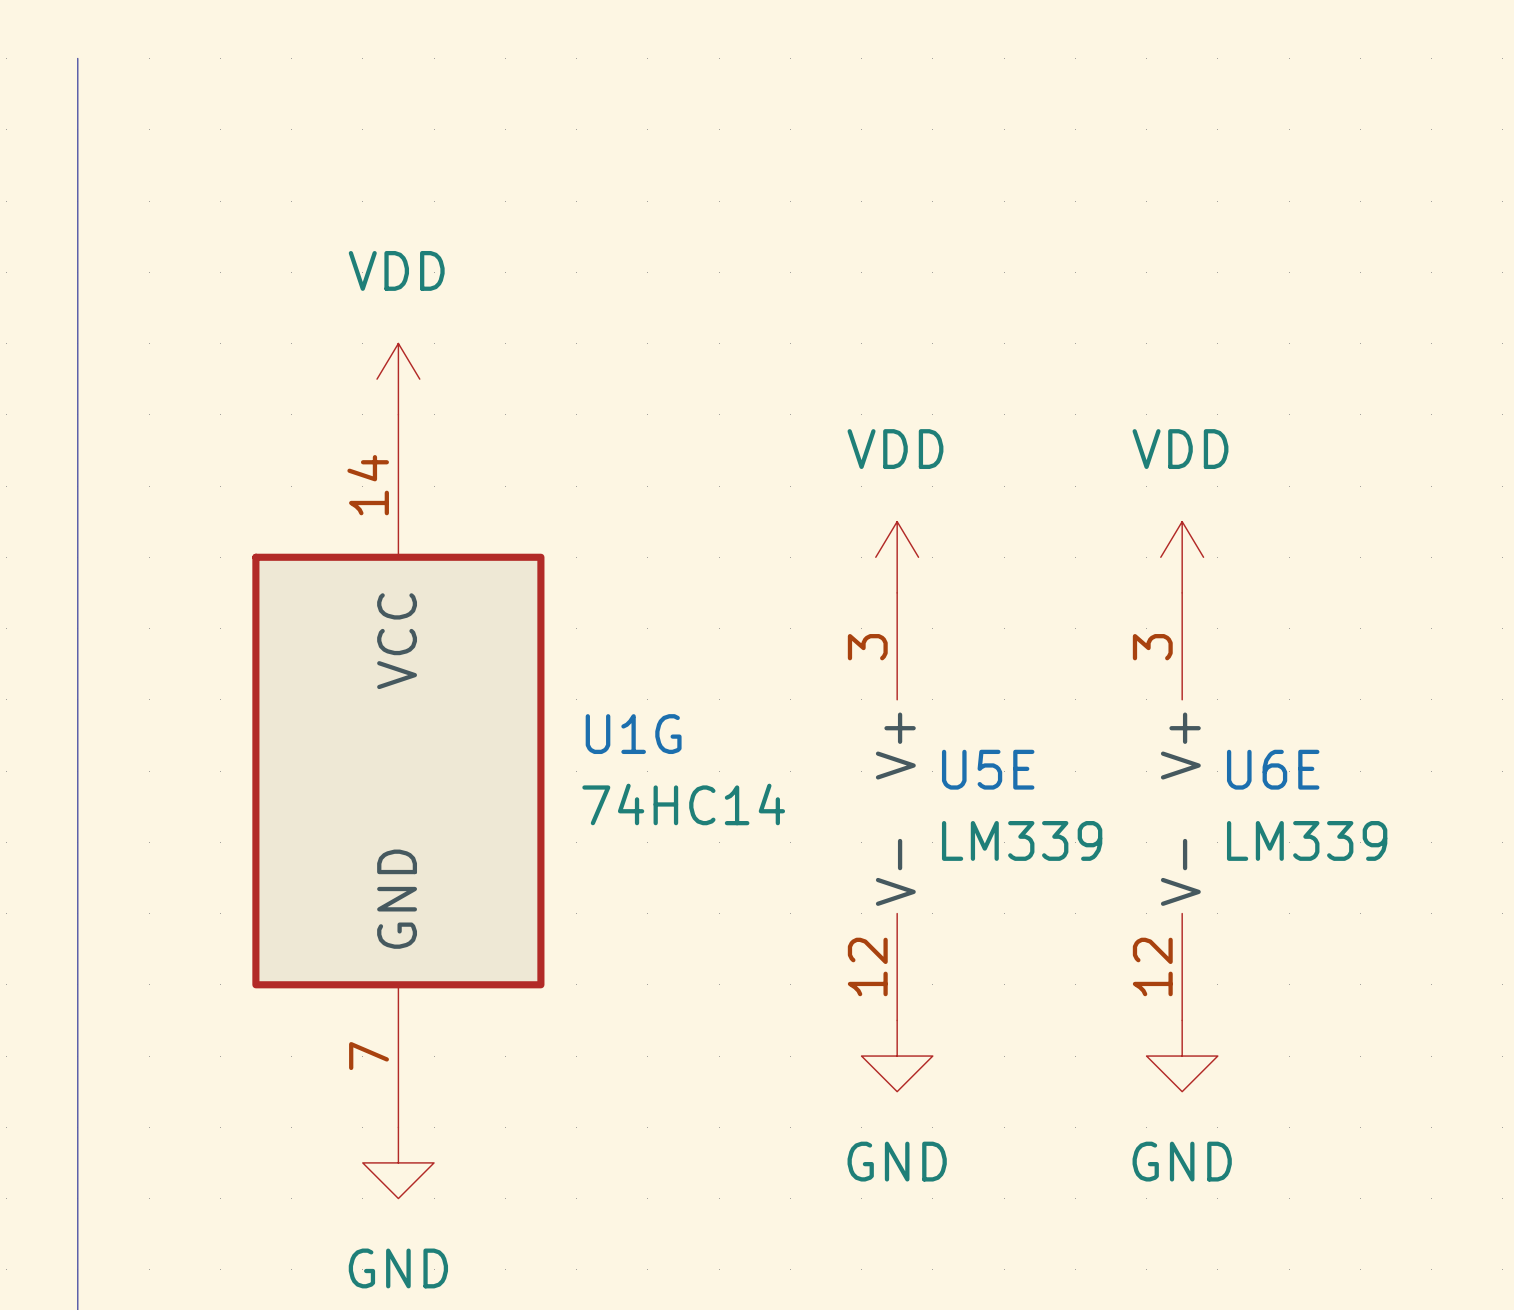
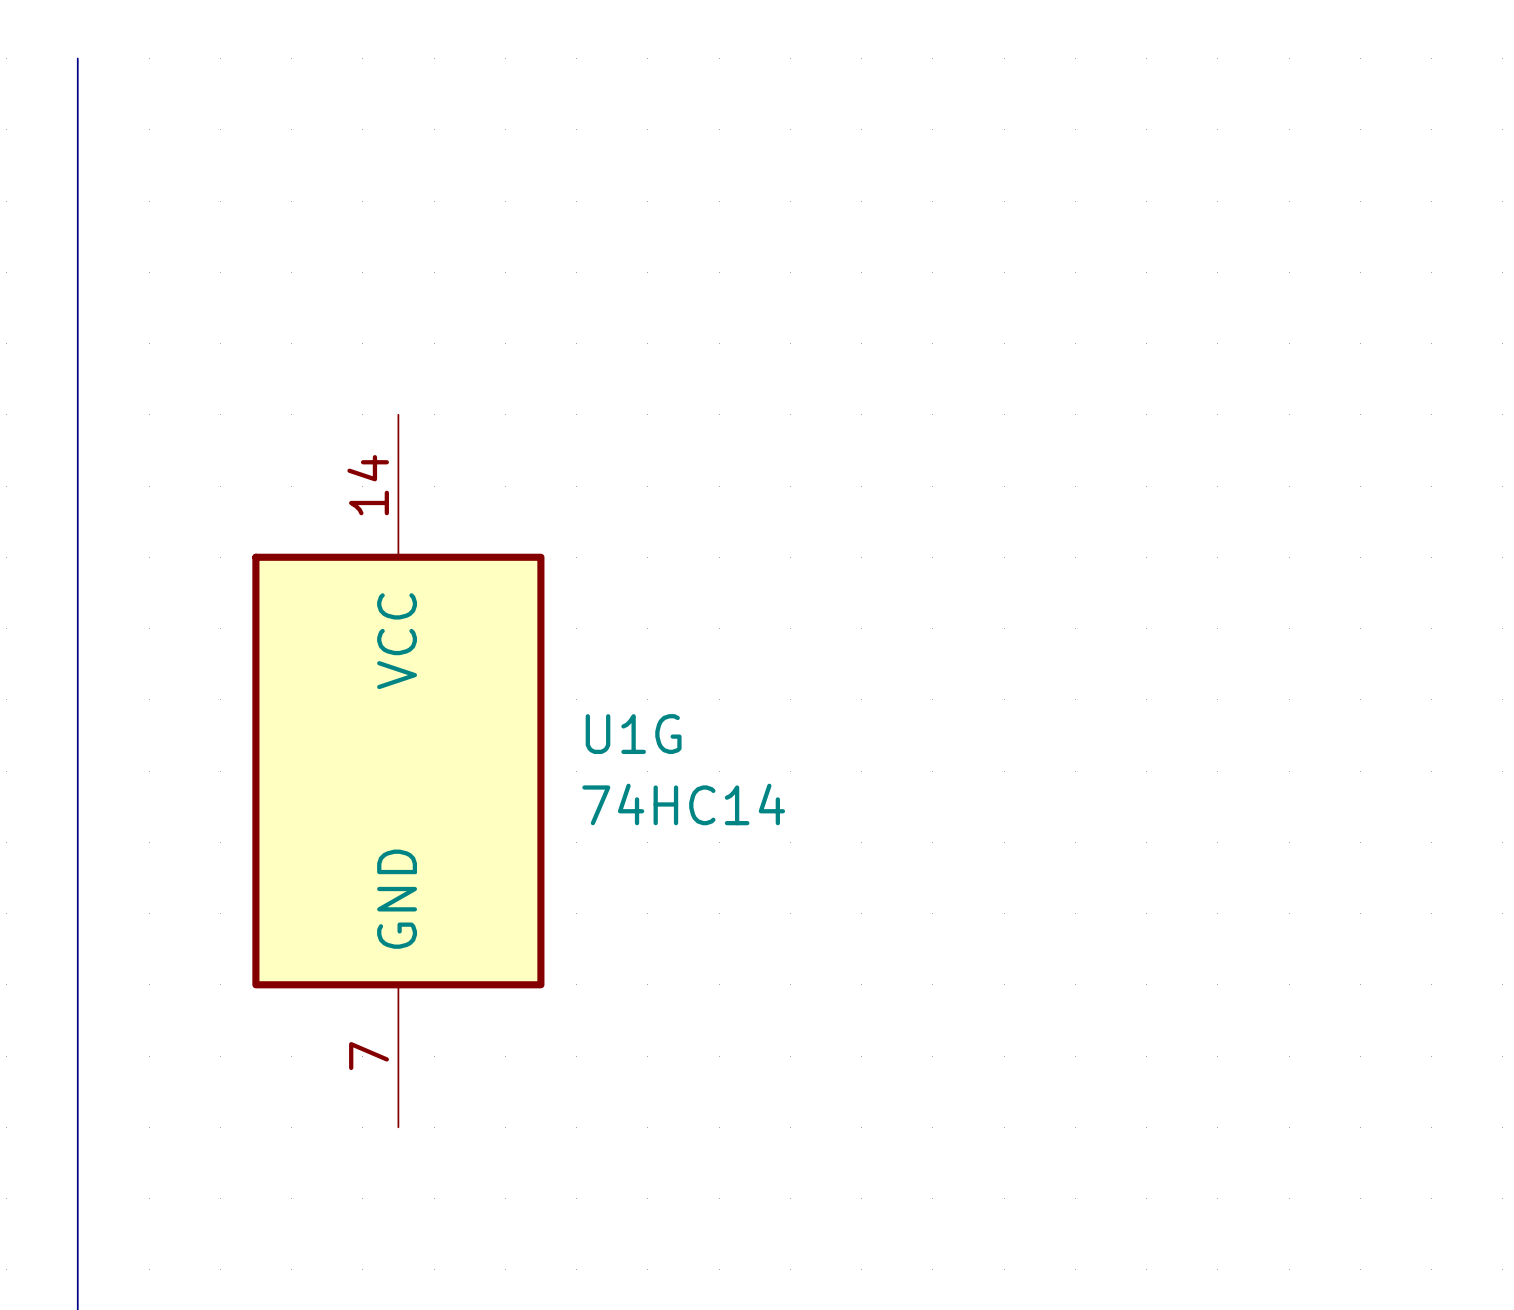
power symbol: VDD (398, 379) -> none
power symbol: VDD (897, 557) -> none
power symbol: VDD (1182, 557) -> none
U5E: LM339 (897, 806) -> none
U6E: LM339 (1182, 806) -> none
power symbol: GND (897, 1056) -> none
power symbol: GND (1182, 1056) -> none
power symbol: GND (398, 1162) -> none

